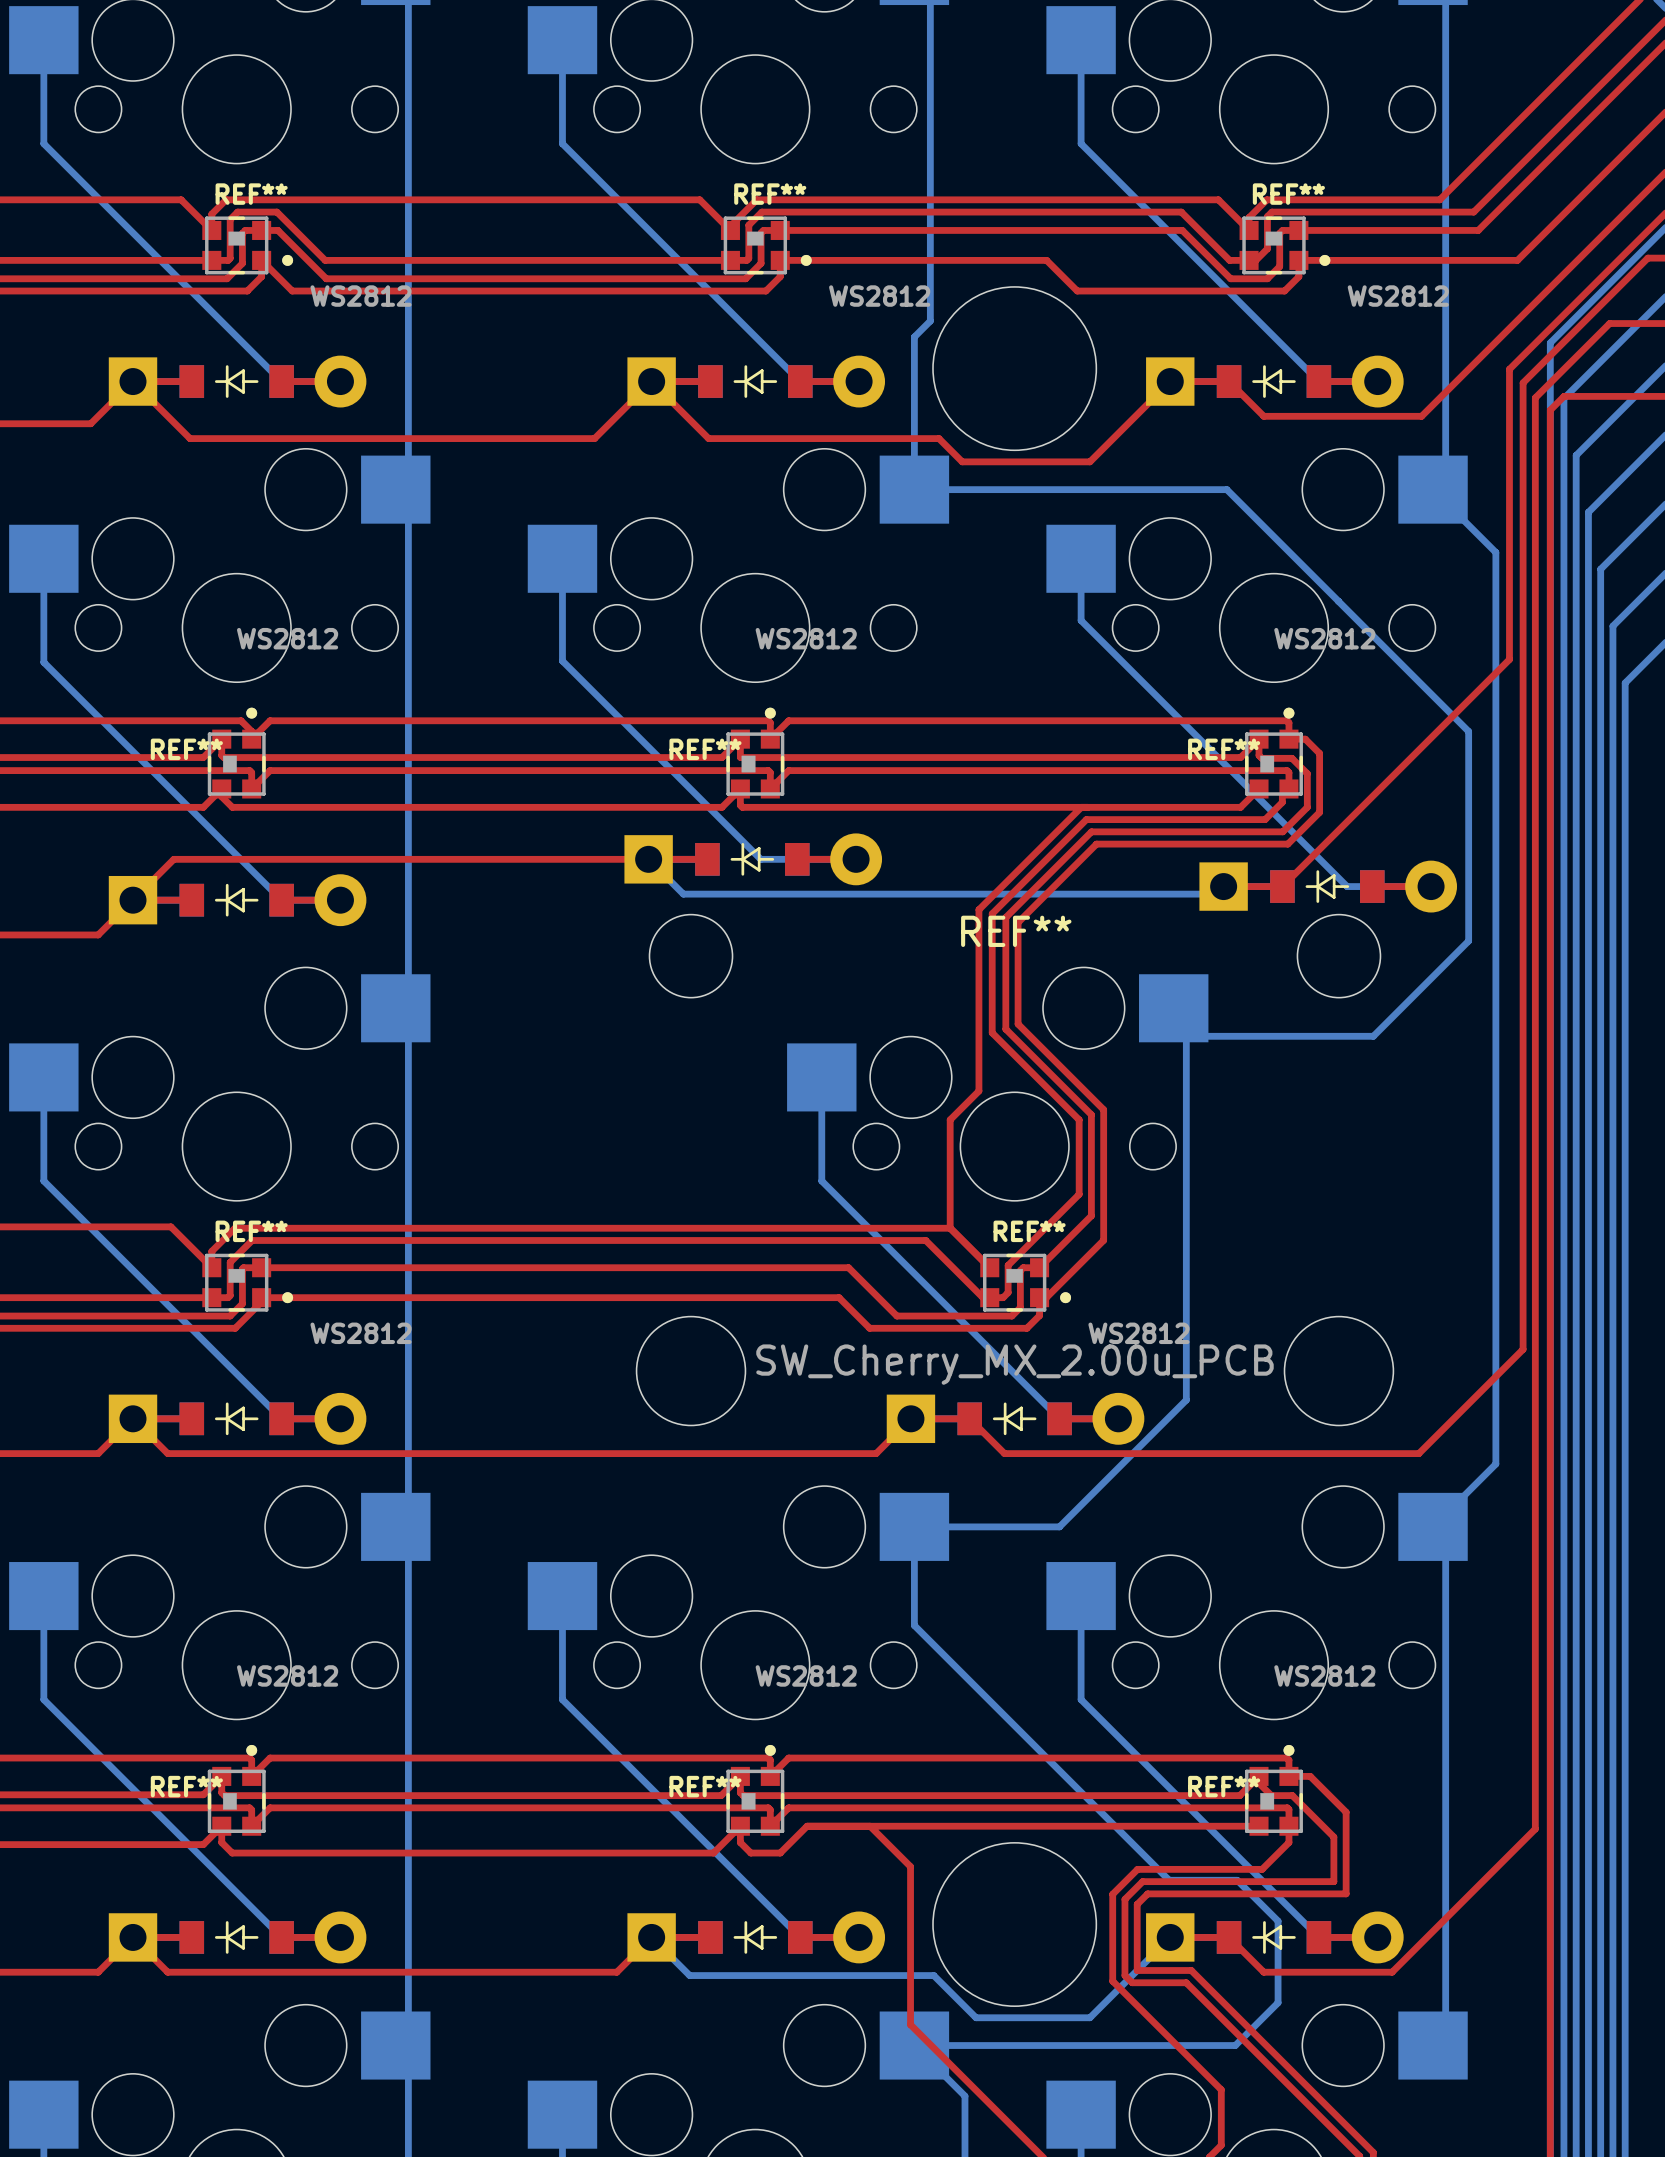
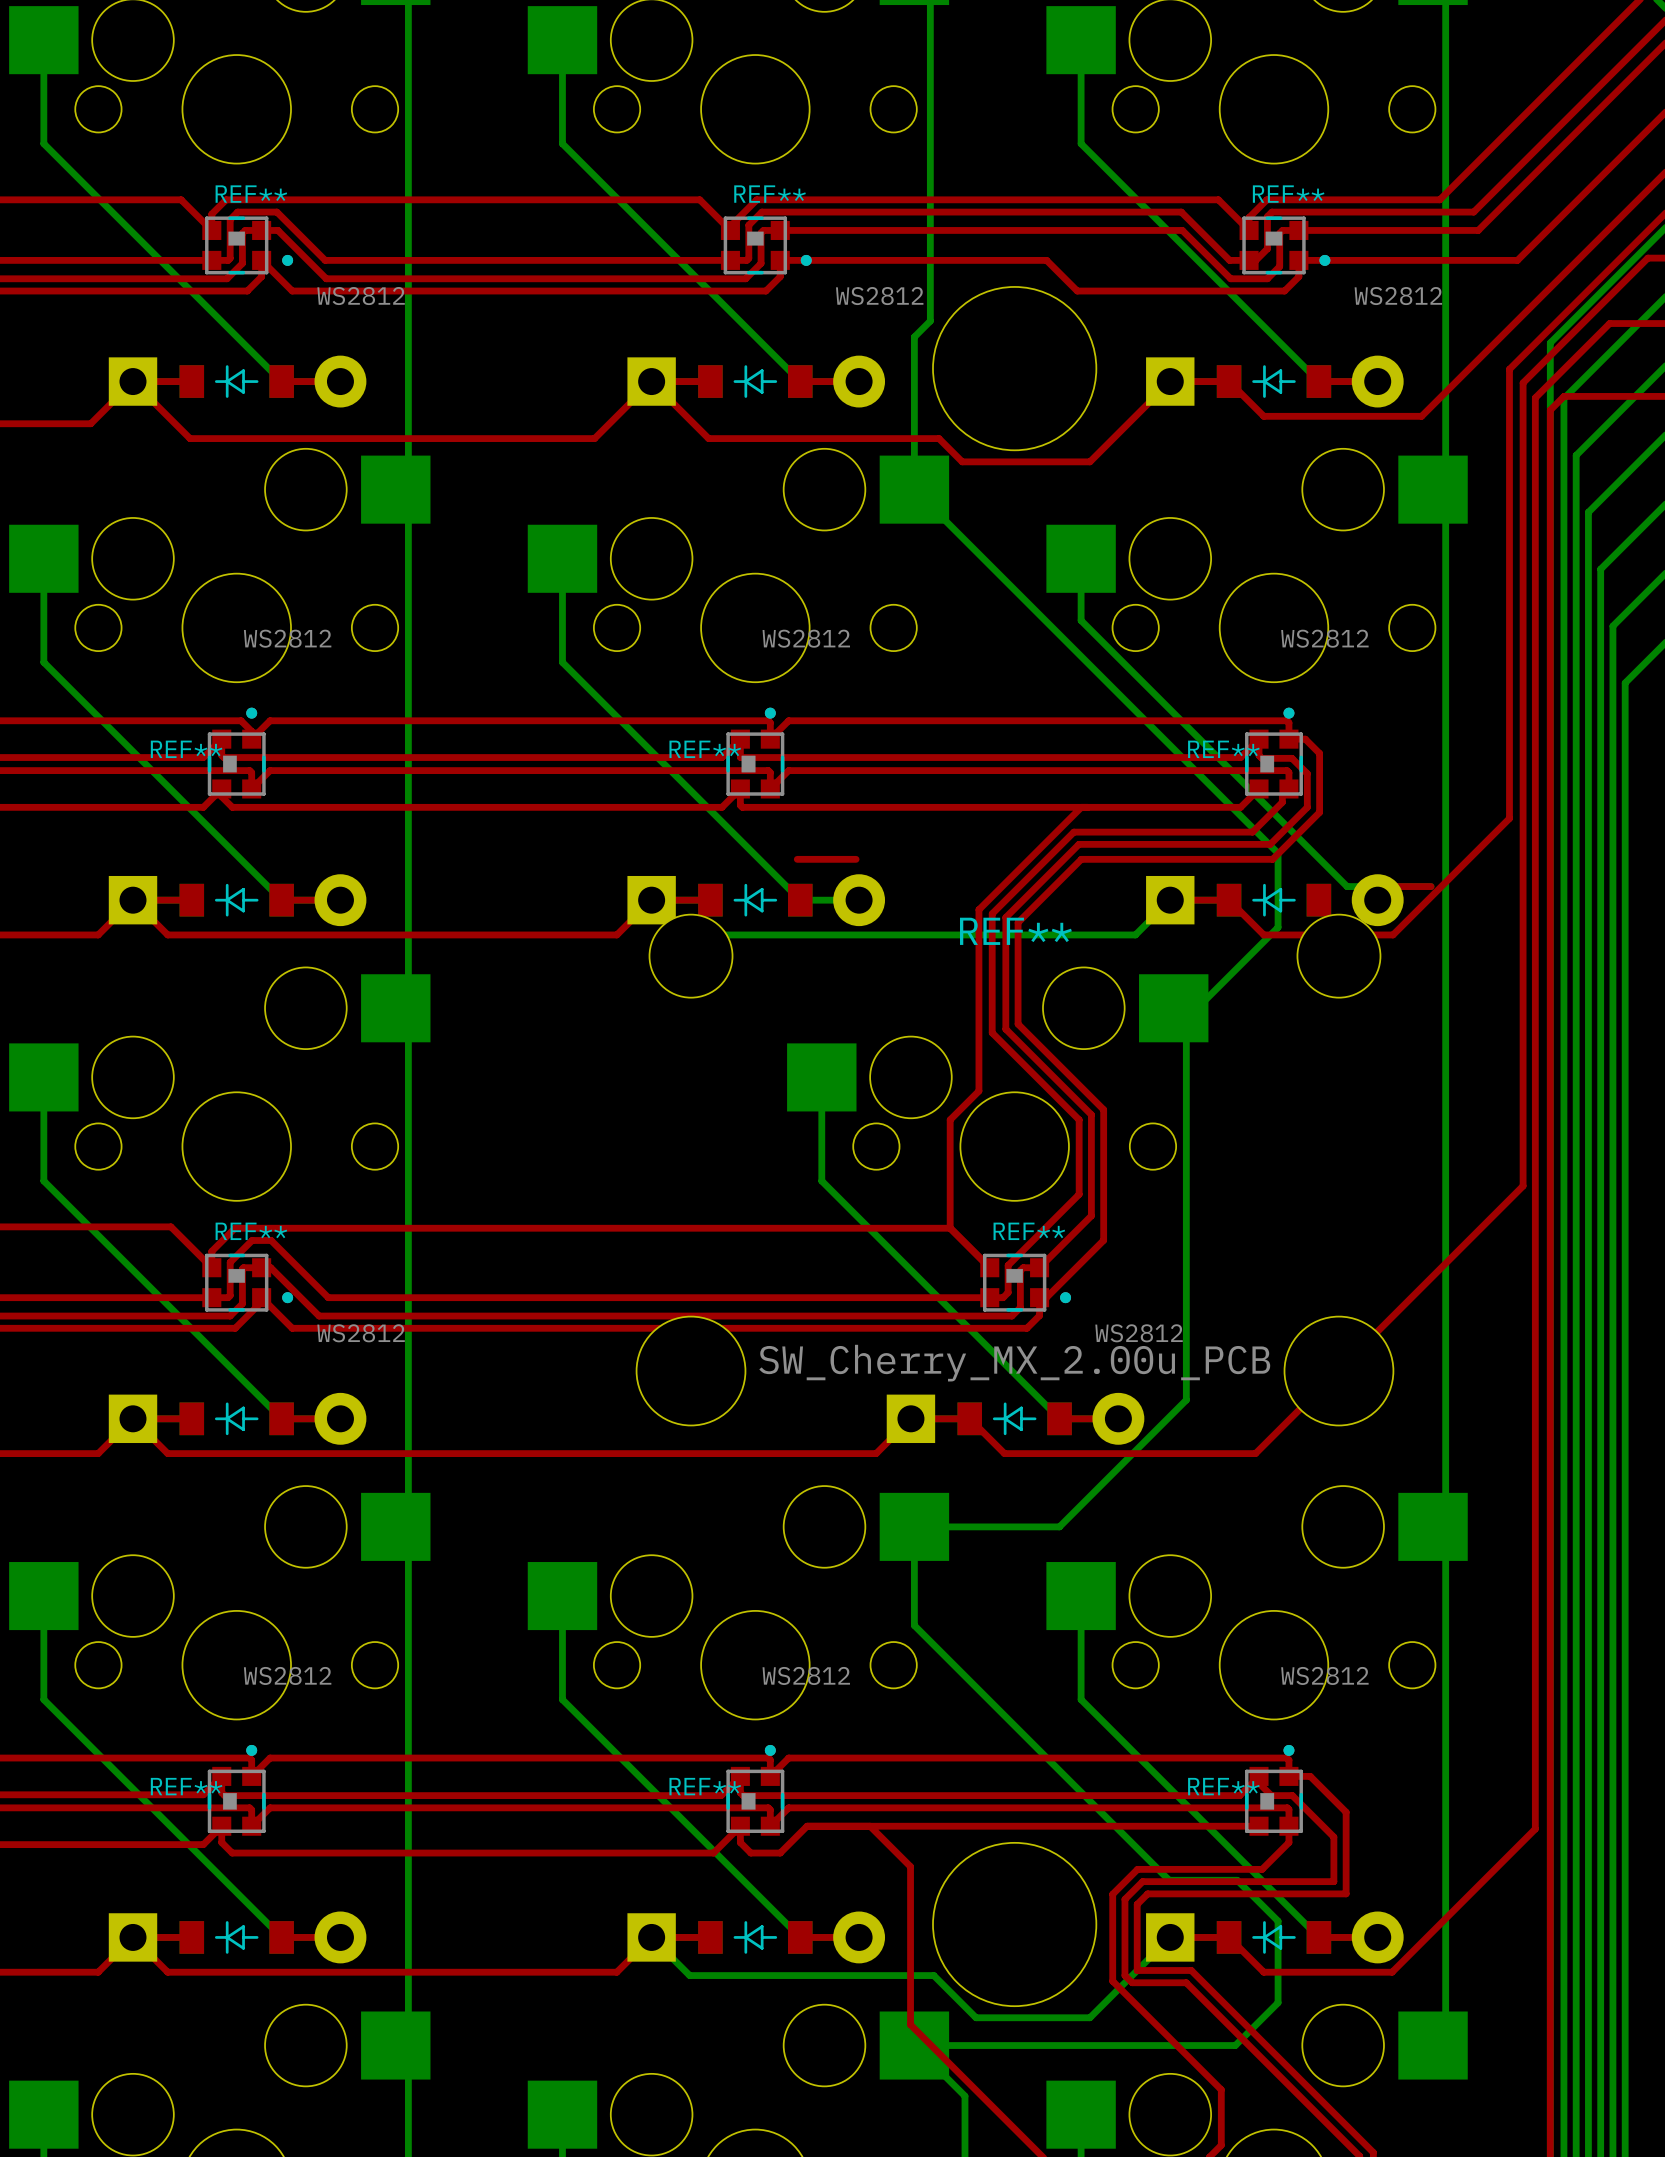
bottom track: (914, 489) (1226, 489) (1468, 731) (1468, 941) (1373, 1036) (1201, 1036) (1186, 1020) -> (914, 489) (1278, 853) (1278, 927) (1197, 1008) (1173, 1008)
bottom track: (1445, 502) (1495, 552) (1495, 1464) (1445, 1514) -> (1445, 502) (1445, 1514)
top track: (1509, 659) (1282, 886) (1223, 886) -> (1509, 659) (1509, 818) (1393, 934) (1263, 934) (1229, 900) (1170, 900)
bottom track: (562, 661) (760, 859) (856, 859) -> (562, 661) (800, 900) (859, 900)
top track: (1265, 819) (1086, 819) (1073, 832) -> (1265, 819) (1252, 832) (1073, 832)
top track: (1282, 831) (1091, 831) (1078, 844) -> (1282, 831) (1270, 844) (1078, 844)
top track: (1287, 844) (1096, 844) (1081, 859) -> (1287, 844) (1272, 859) (1081, 859)
bottom track: (707, 859) (648, 859) (683, 894) (1216, 894) (1223, 886) (1282, 886) -> none
top track: (707, 859) (173, 859) (133, 900) -> (710, 900) (651, 900) (616, 934) (167, 934) (133, 900)
part position: (753, 859) -> (756, 900)
part position: (1328, 886) -> (1274, 900)
bottom track: none -> (710, 900) (651, 900) (686, 934) (1135, 934) (1170, 900) (1229, 900)
top track: (1523, 1186) (1523, 1349) (1418, 1453) (1255, 1453) -> (1523, 1186) (1255, 1453)
top track: (271, 1240) (925, 1240) (982, 1297) -> none
top track: (270, 1267) (848, 1267) (896, 1316) -> (270, 1267) (319, 1316) (896, 1316)
top track: (261, 1297) (328, 1297) -> (271, 1240) (328, 1297)
top track: none -> (261, 1297) (292, 1328) (869, 1328)
top track: (839, 1297) (869, 1328) -> (839, 1297) (982, 1297)

